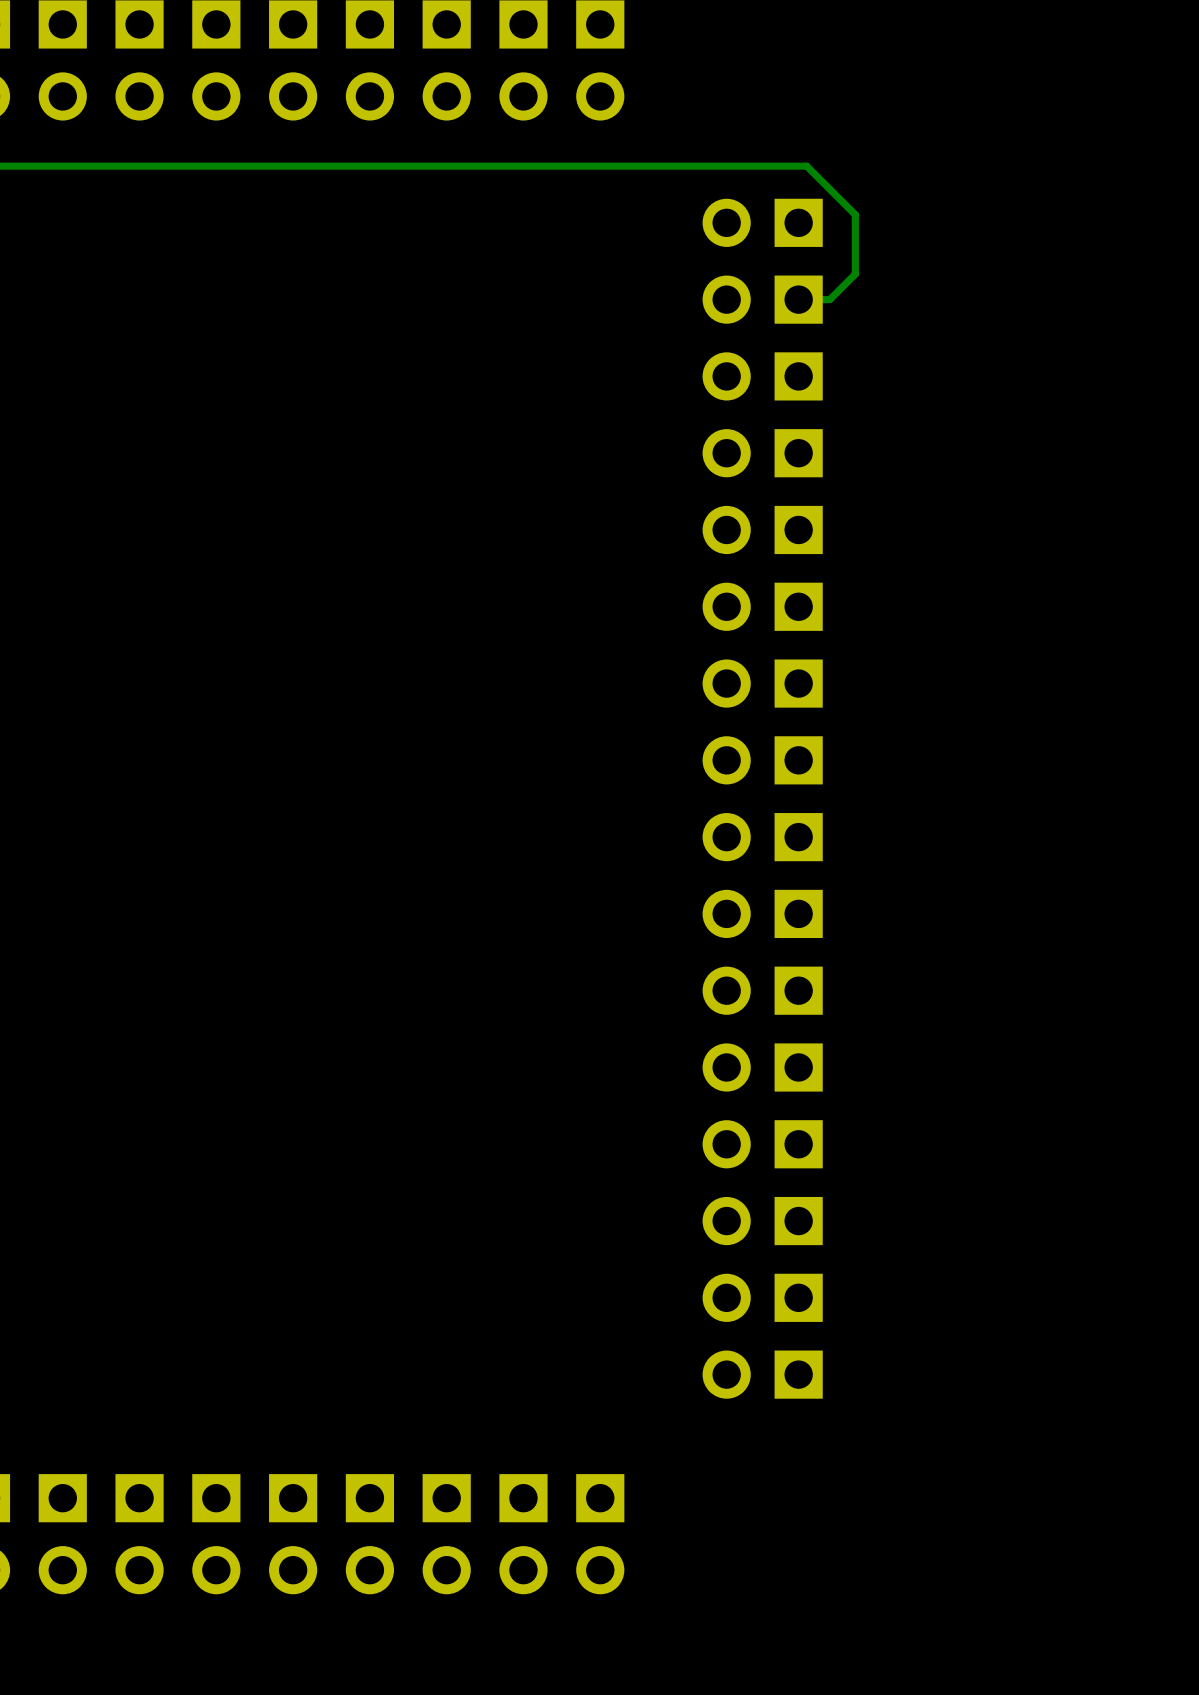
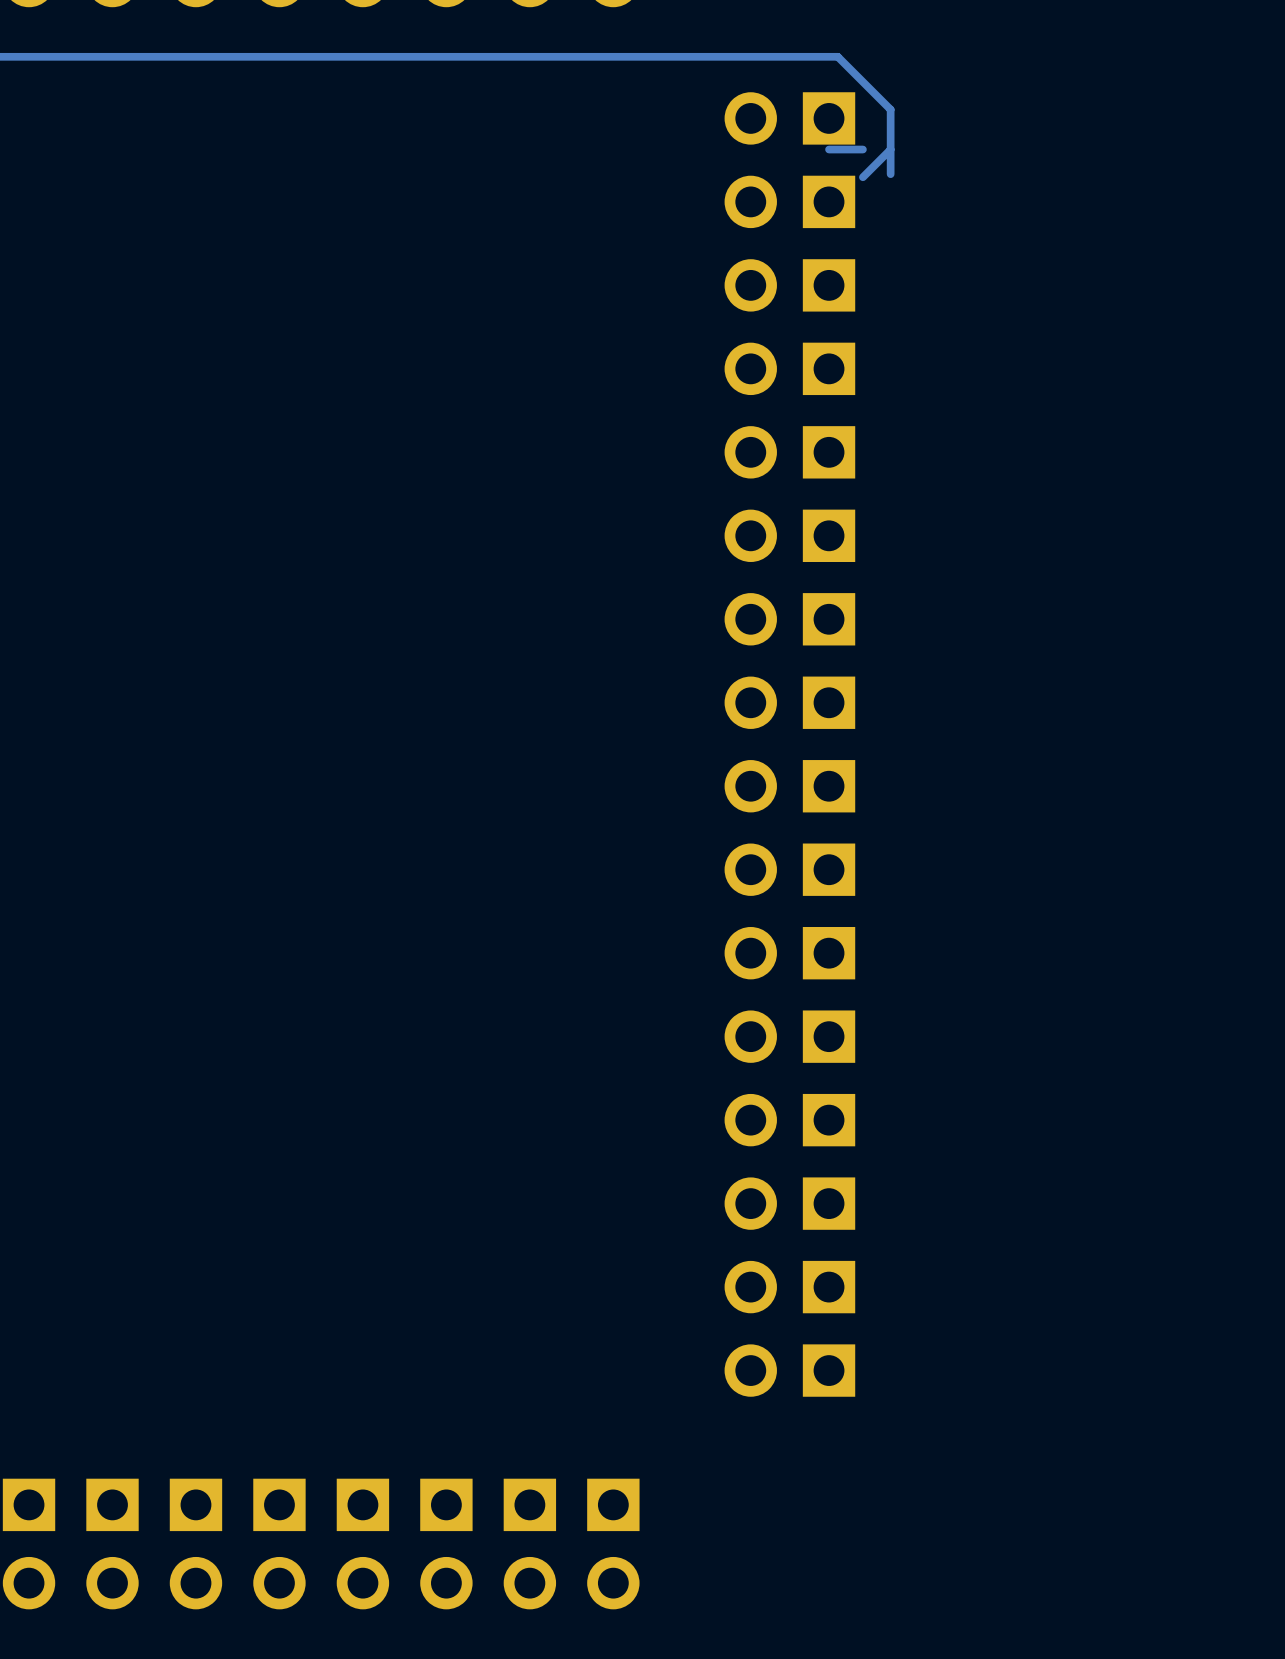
track: none -> (862, 149) (829, 149)
track: none -> (890, 149) (862, 177)
track: (855, 274) (829, 299) (798, 299) -> none

